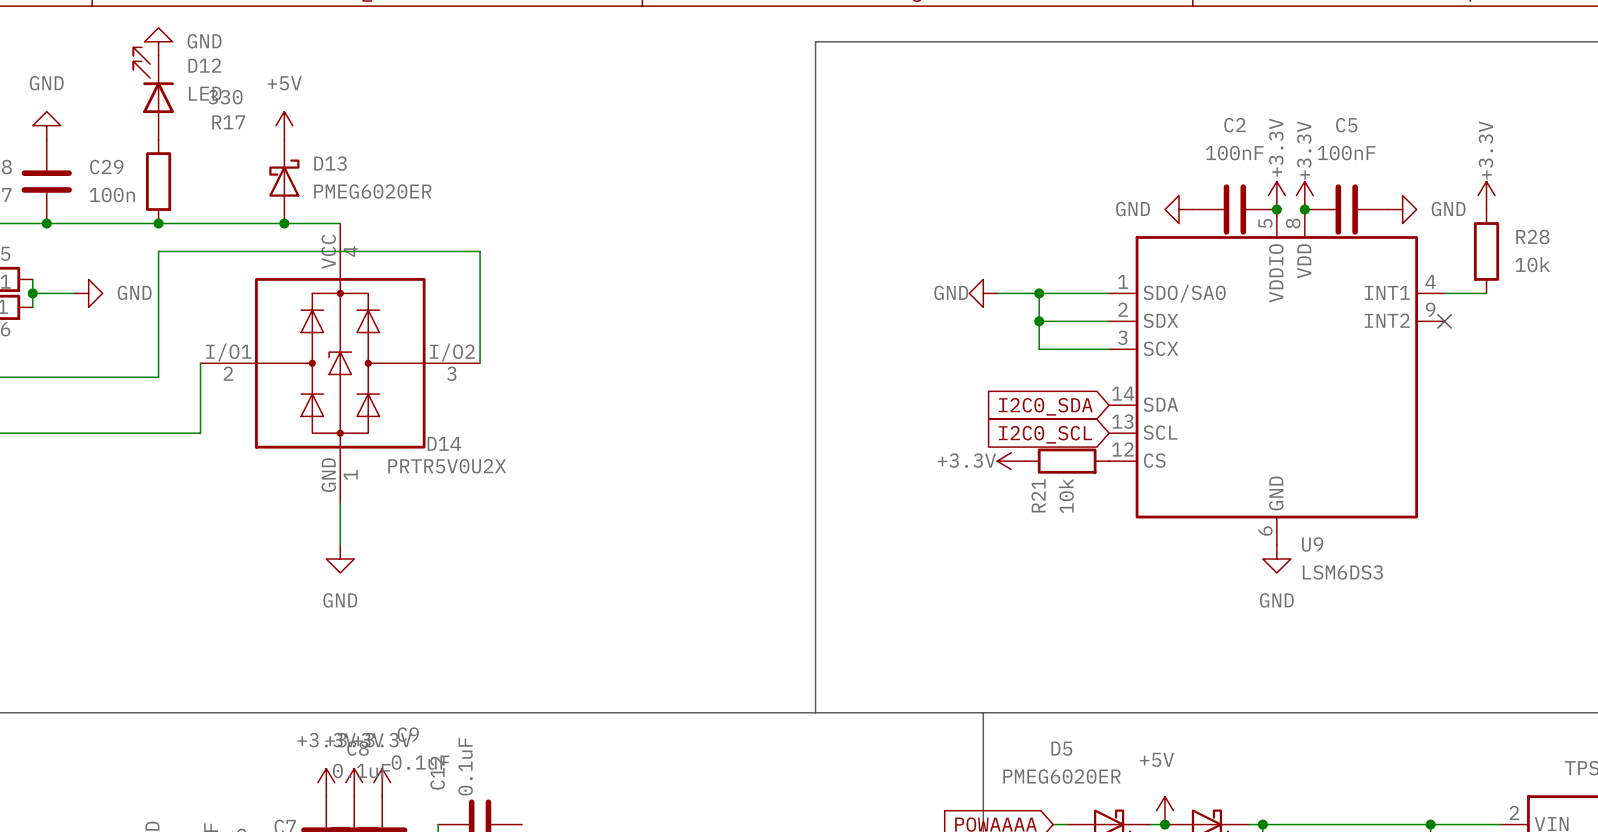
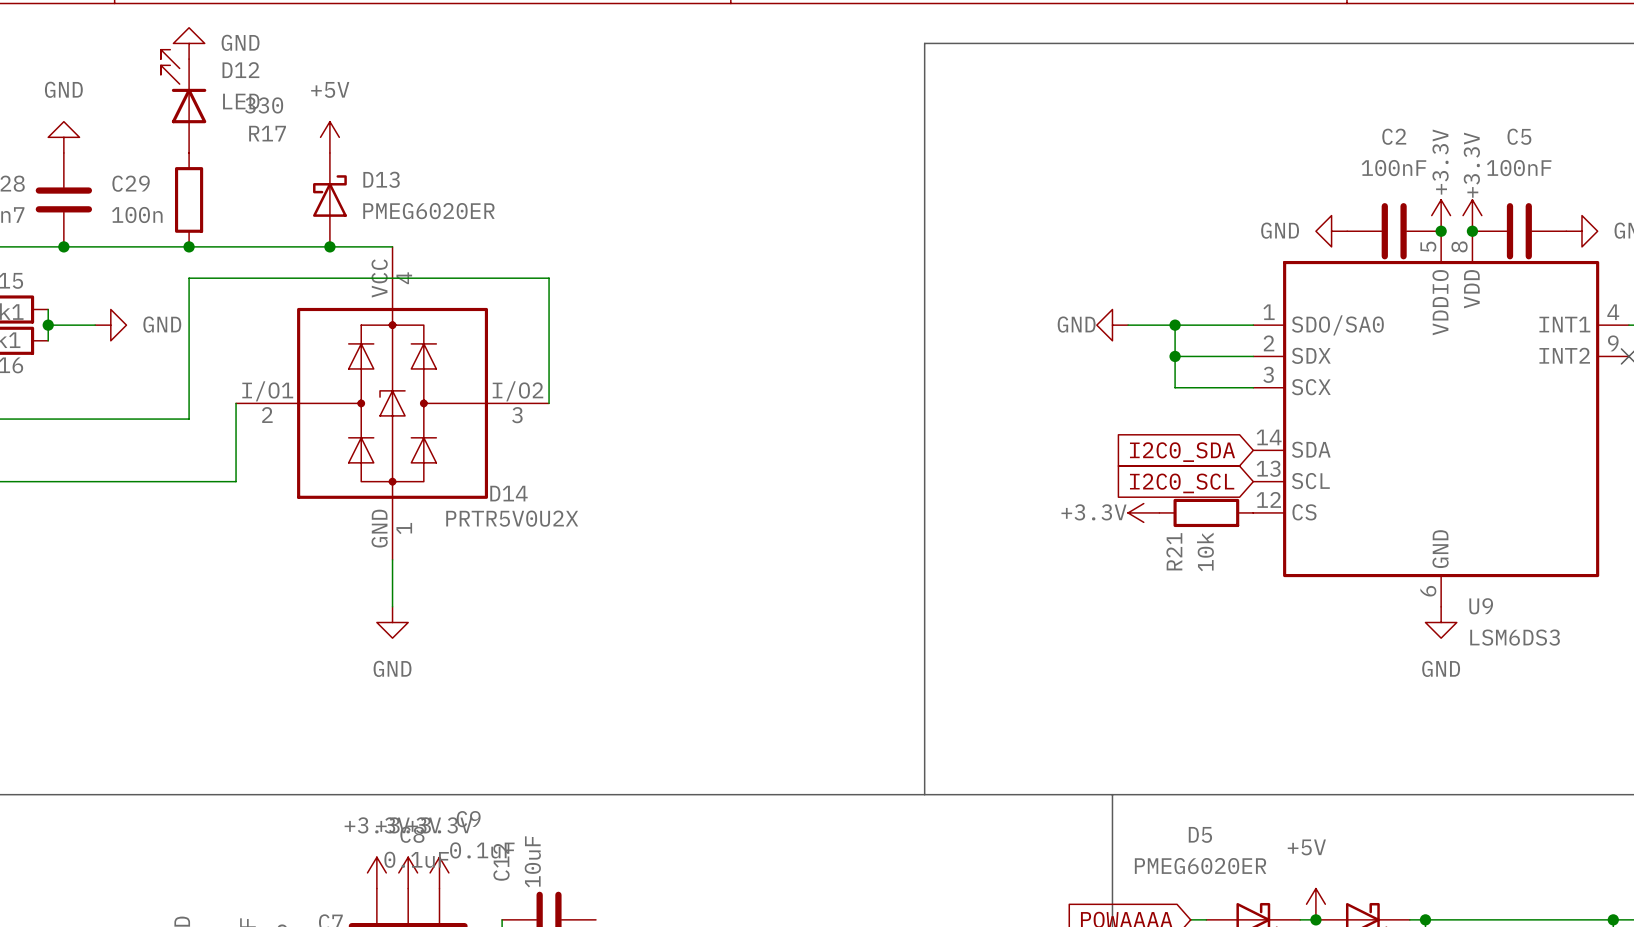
C12 value: 0.1uF (465, 766) -> 10uF (532, 861)

